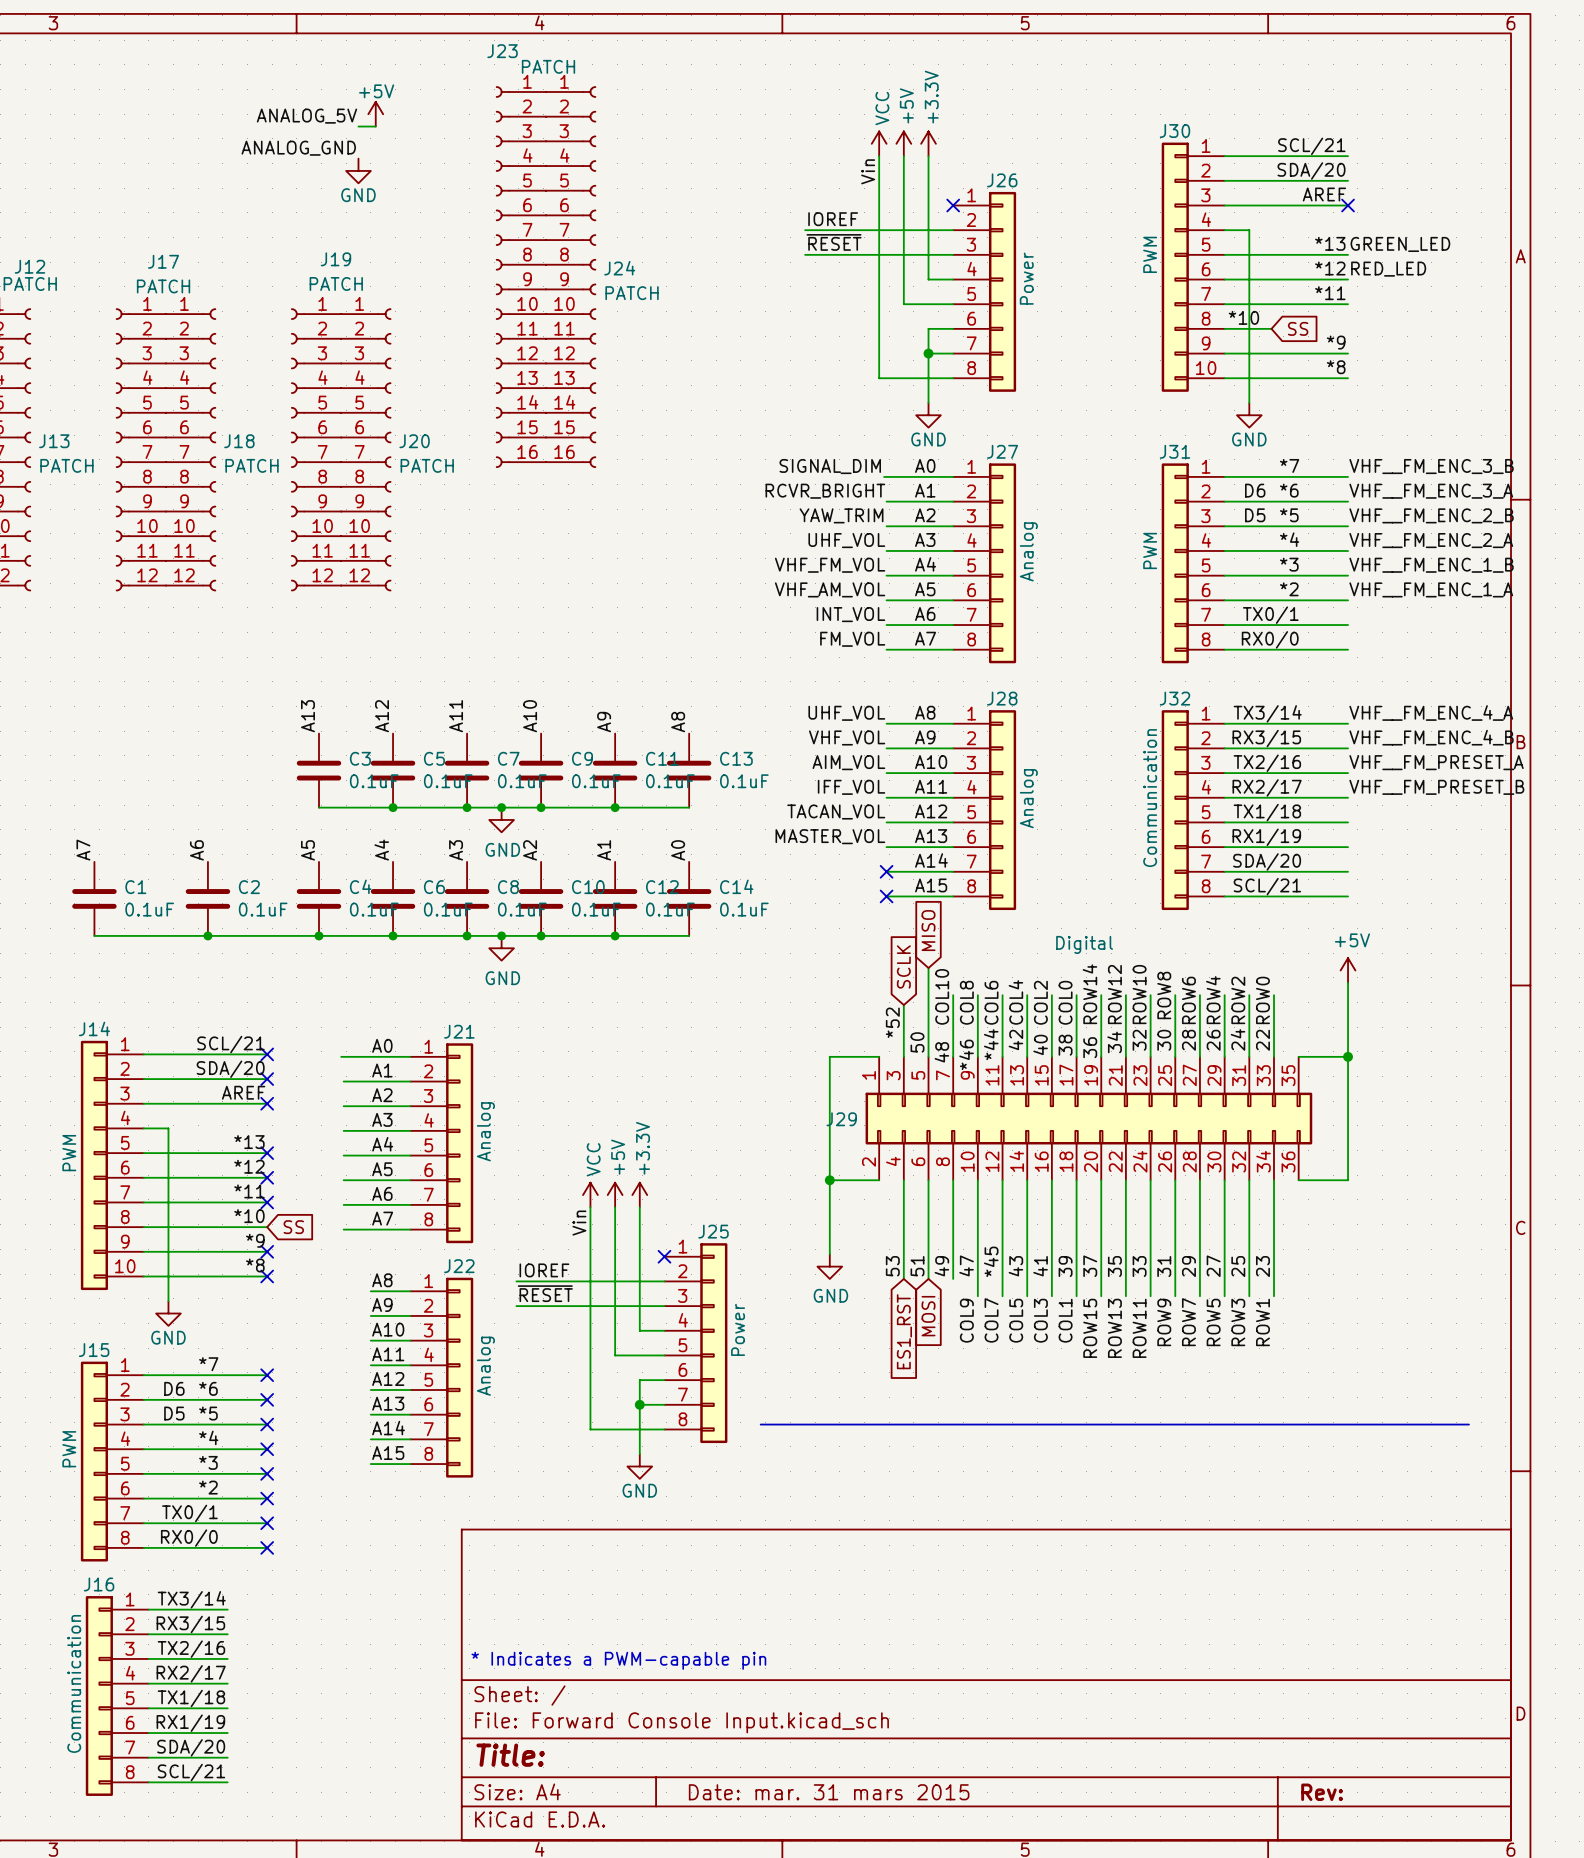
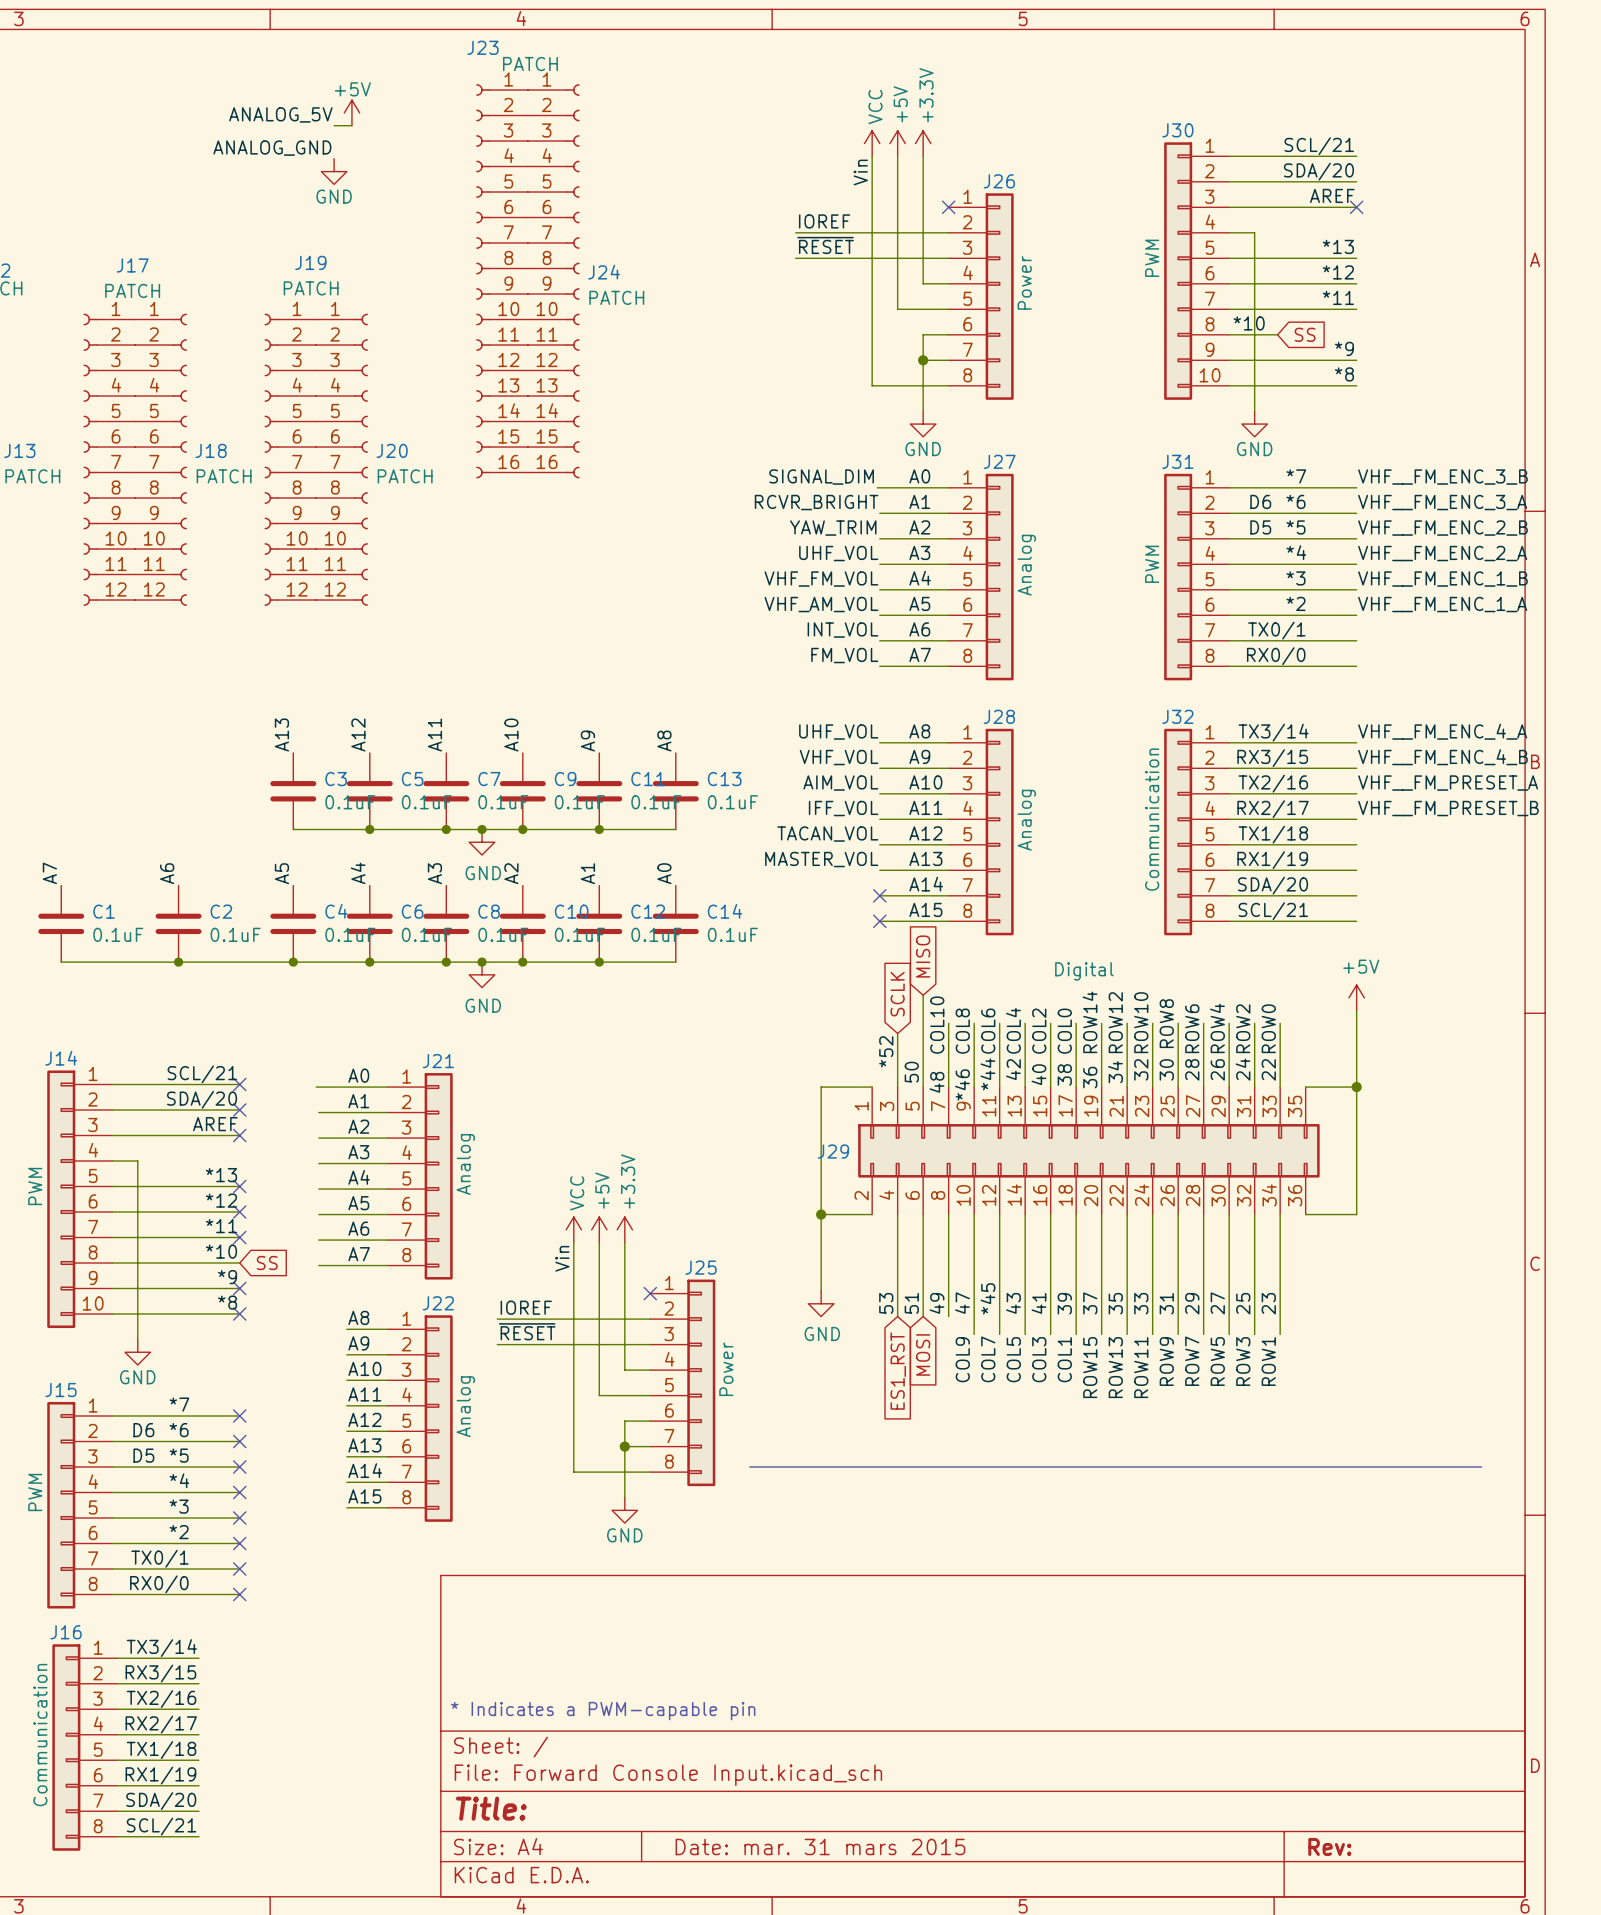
label: GREEN_LED (1400, 244) -> none
label: RED_LED (1388, 269) -> none

